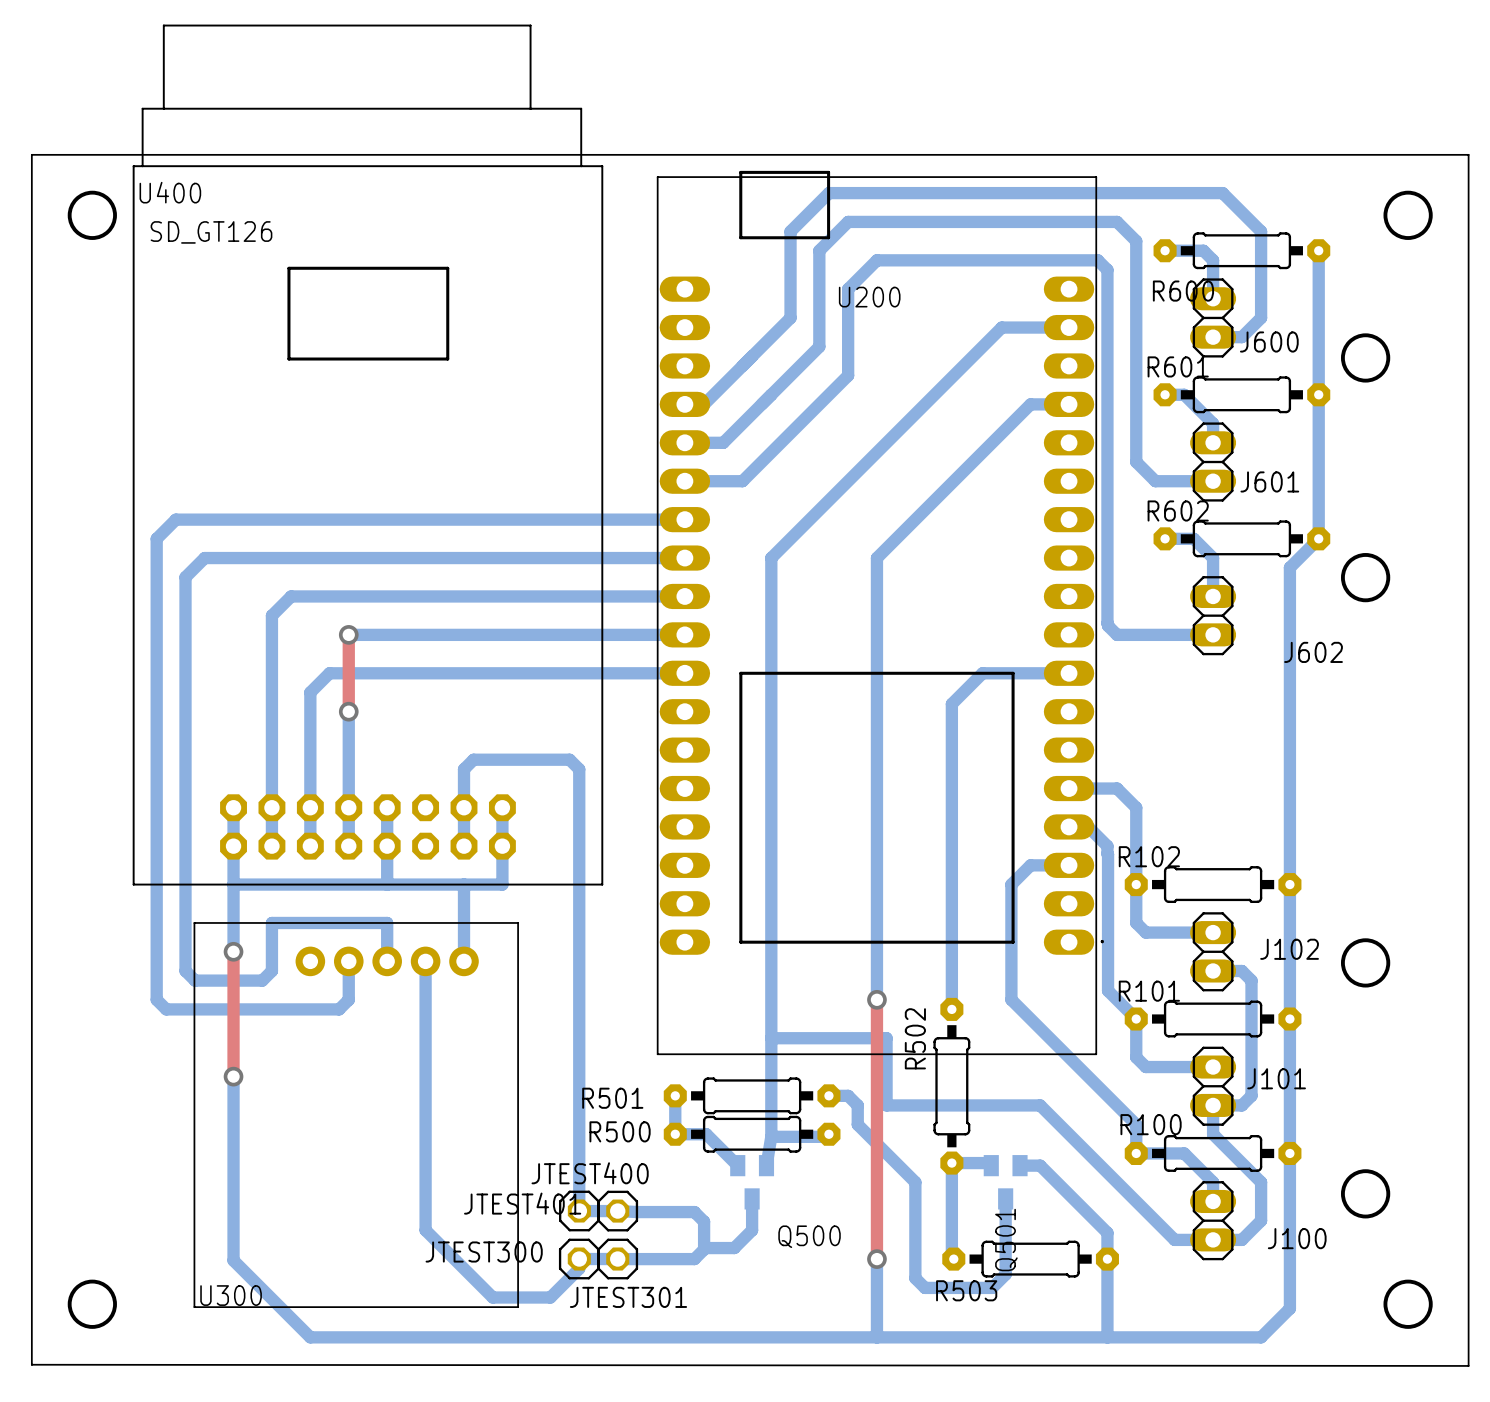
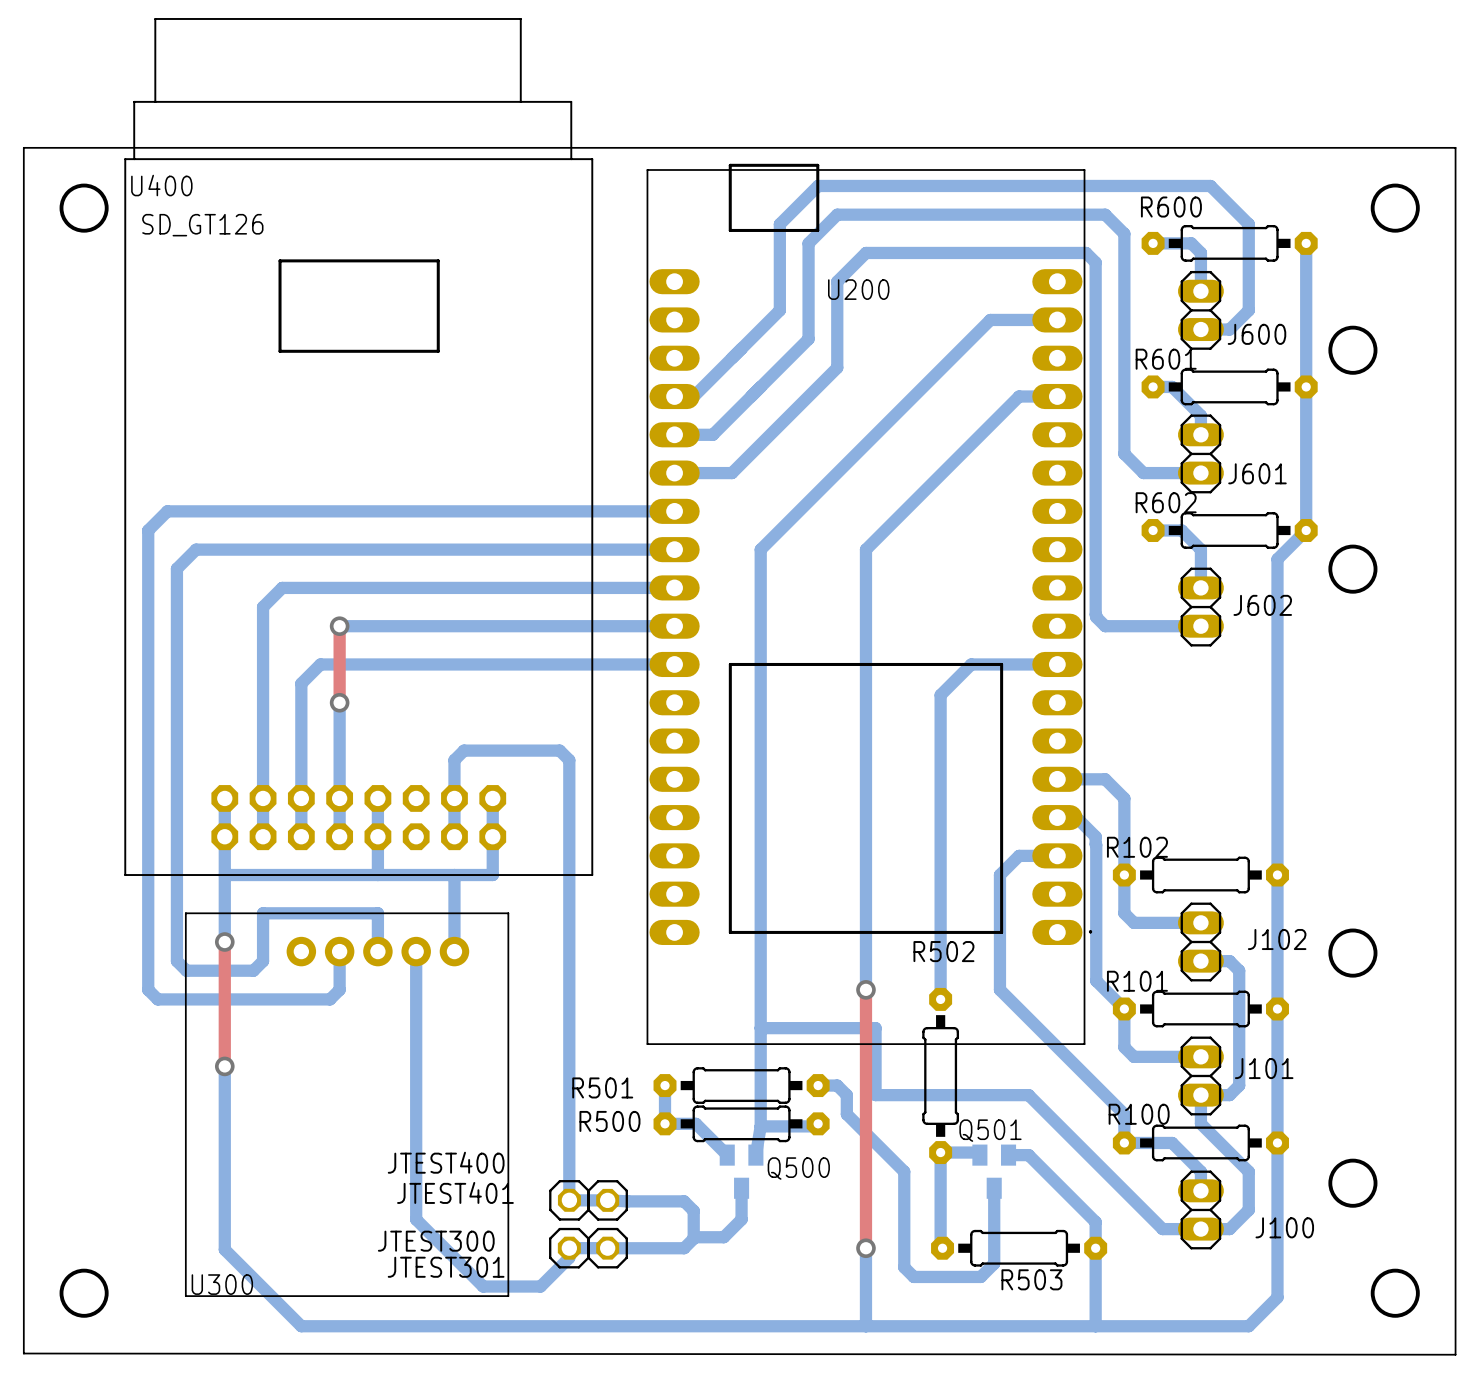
R600 name position: R600 (1183, 291) -> R600 (1171, 207)
J602 name position: J602 (1313, 652) -> J602 (1262, 605)
R502 name rotation: 0° (915, 1038) -> 90° clockwise (943, 951)
R502 name position: R502 (915, 1038) -> R502 (943, 951)
JTEST400 name position: JTEST400 (590, 1173) -> JTEST400 (446, 1162)
JTEST401 name position: JTEST401 (522, 1203) -> JTEST401 (455, 1192)
Q500 name position: Q500 (809, 1236) -> Q500 (798, 1168)
Q501 name rotation: 0° (1006, 1240) -> 90° clockwise (990, 1130)
Q501 name position: Q501 (1006, 1240) -> Q501 (990, 1130)
JTEST300 name position: JTEST300 (484, 1252) -> JTEST300 (436, 1241)
R503 name position: R503 (966, 1290) -> R503 (1031, 1279)
JTEST301 name position: JTEST301 (628, 1297) -> JTEST301 (446, 1267)

